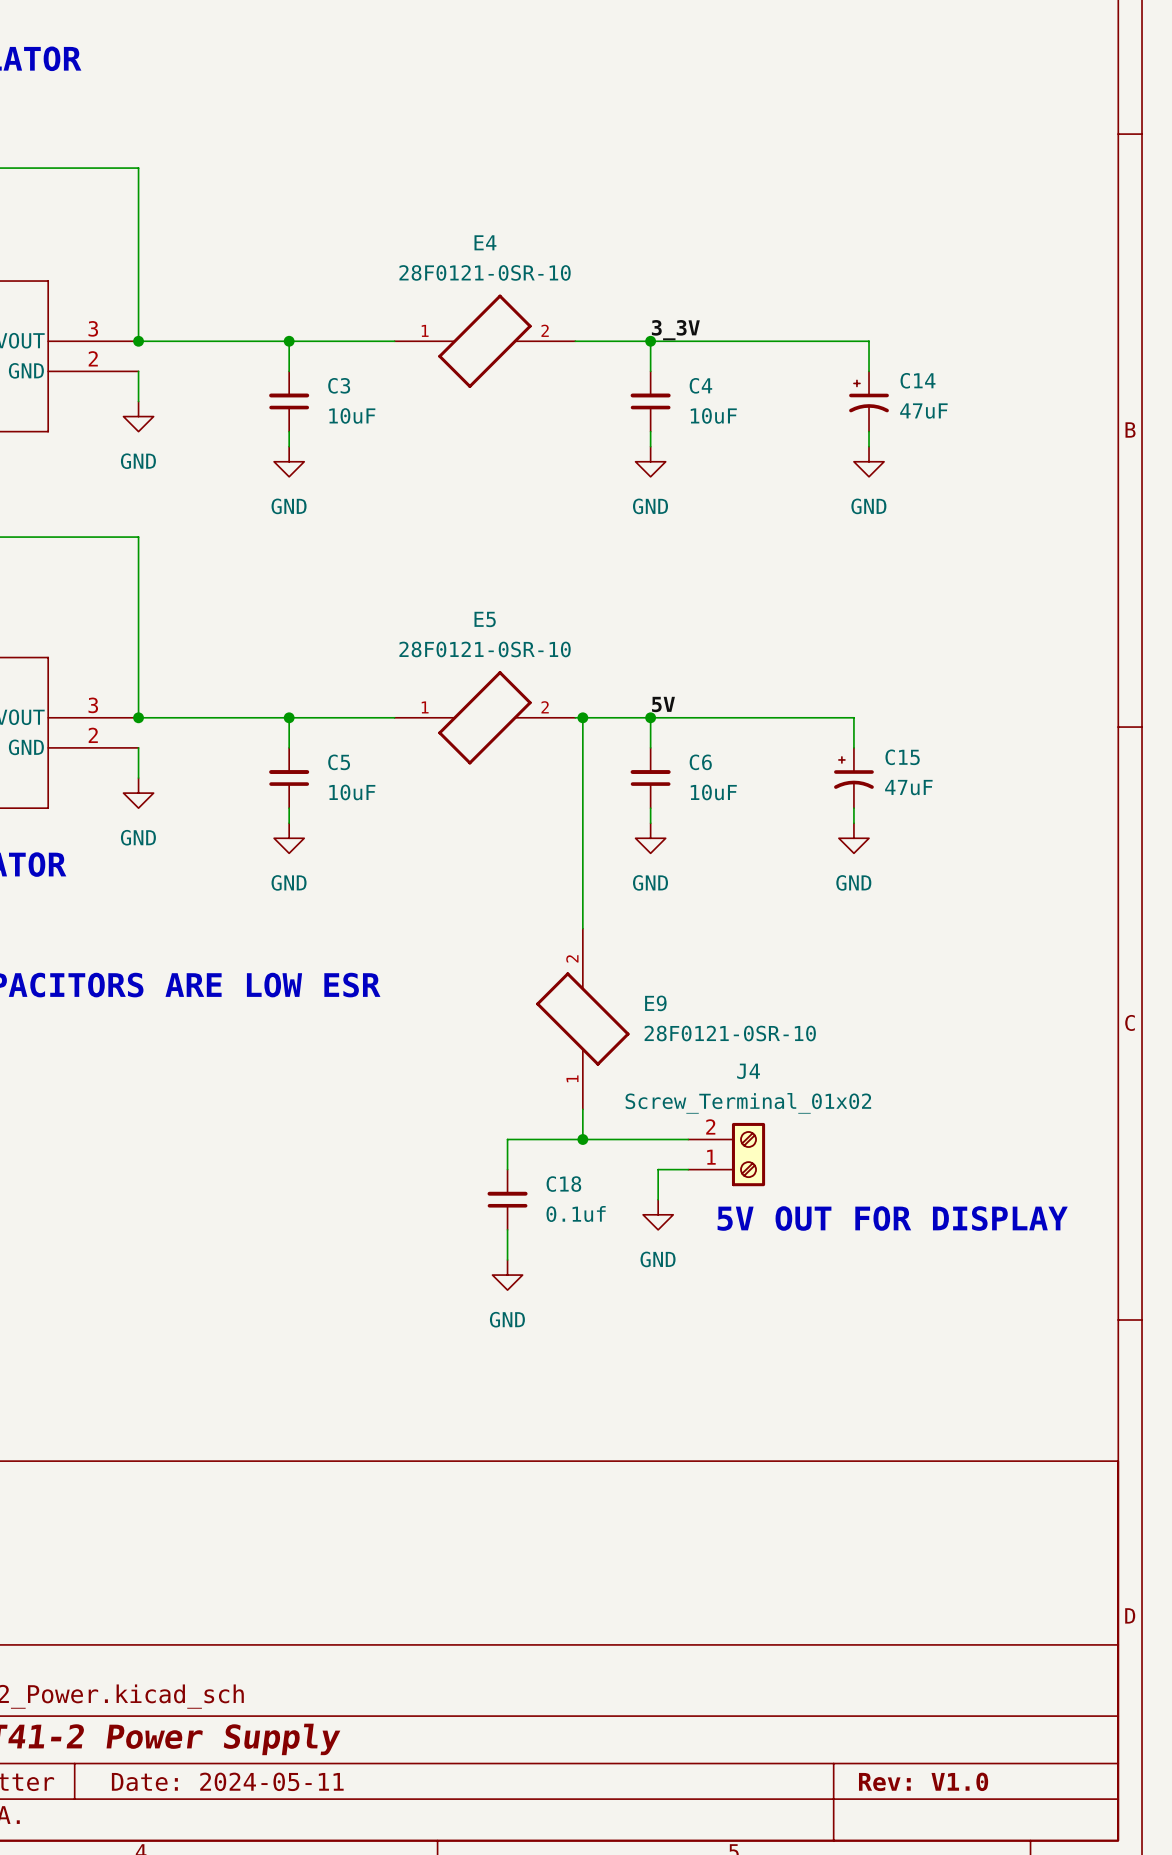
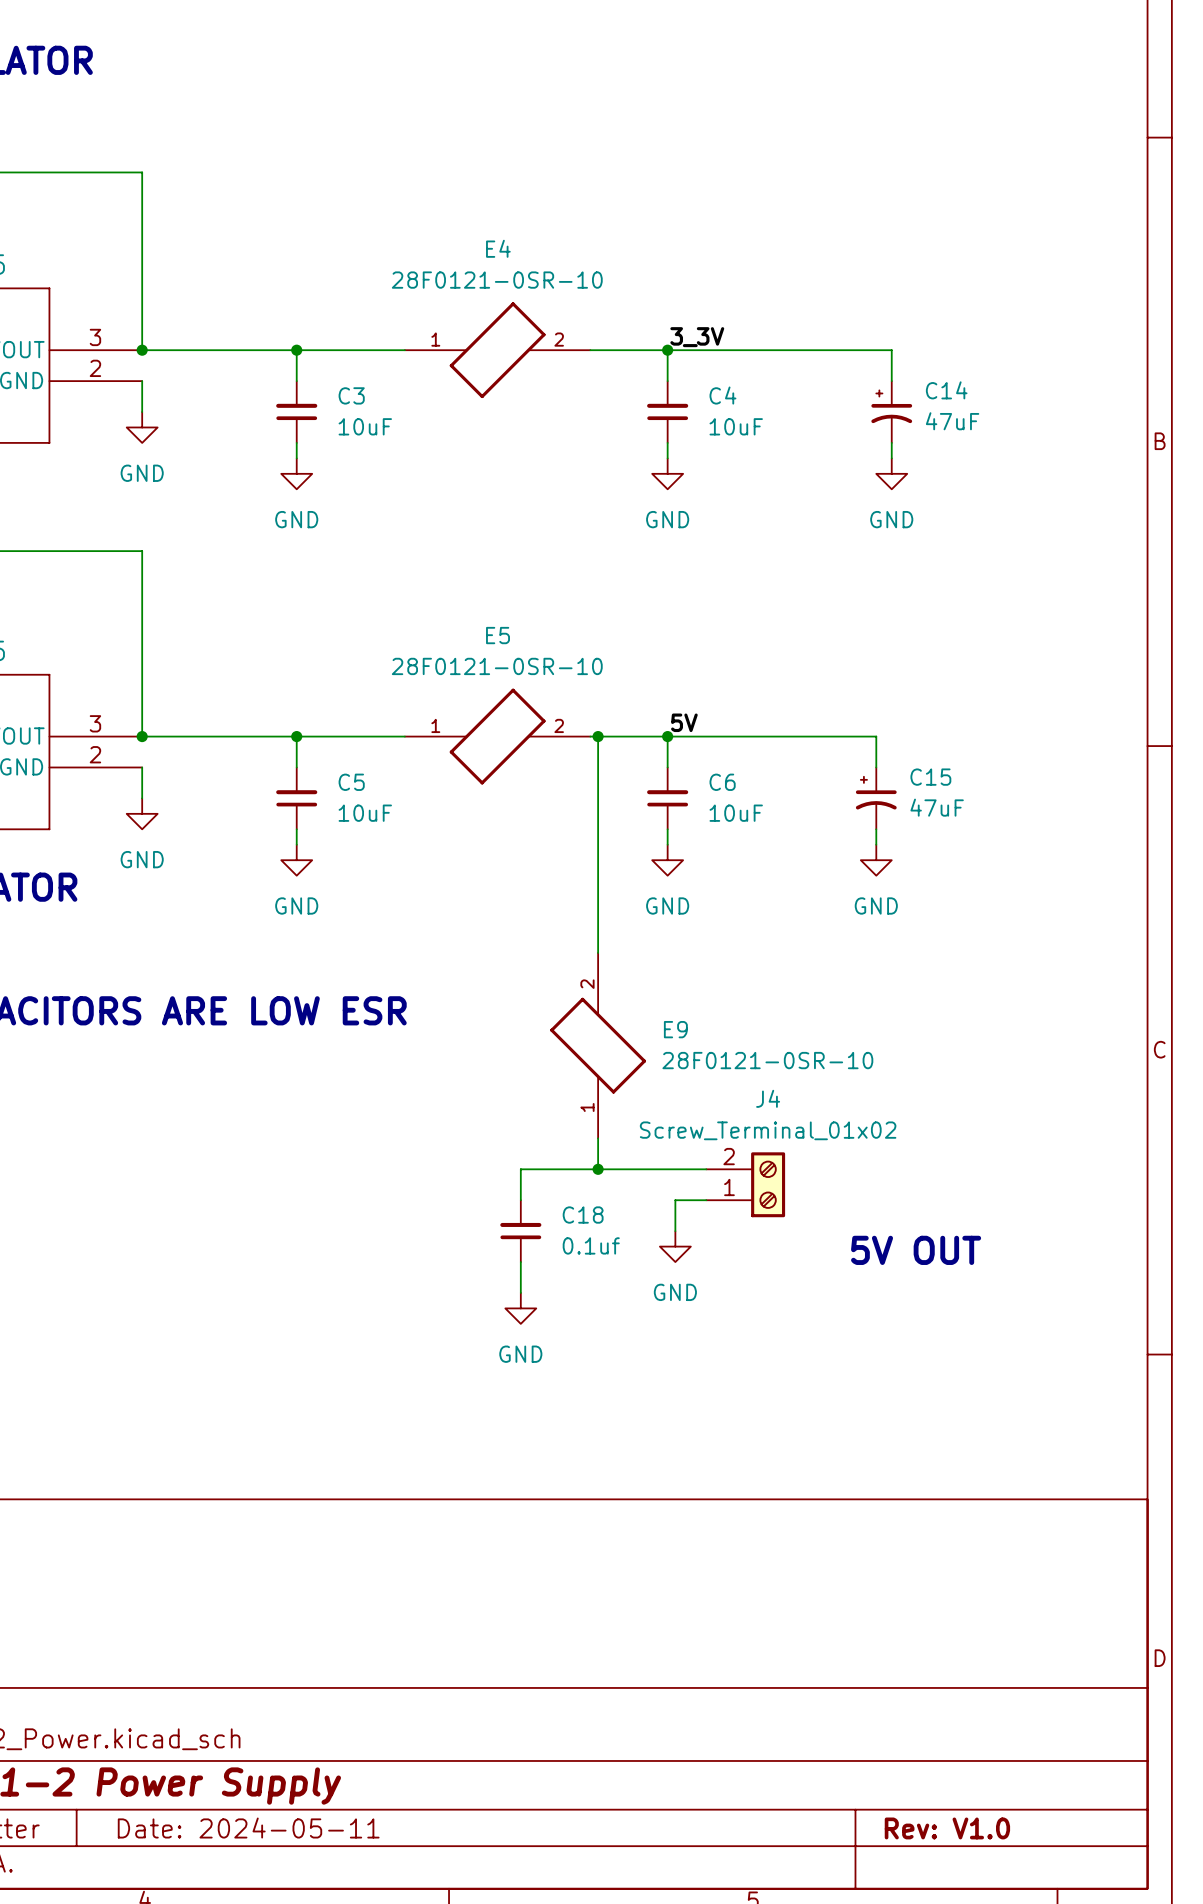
text: 5V OUT FOR DISPLAY (892, 1218) -> 5V OUT (916, 1250)

